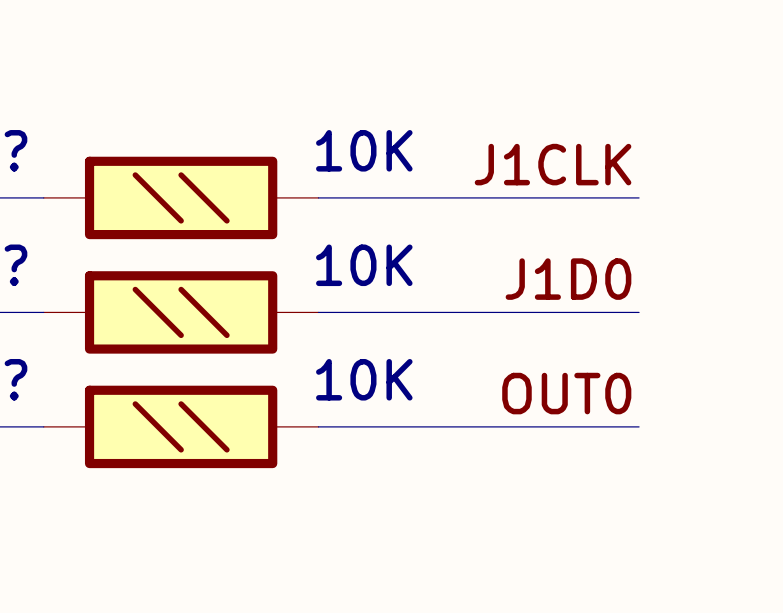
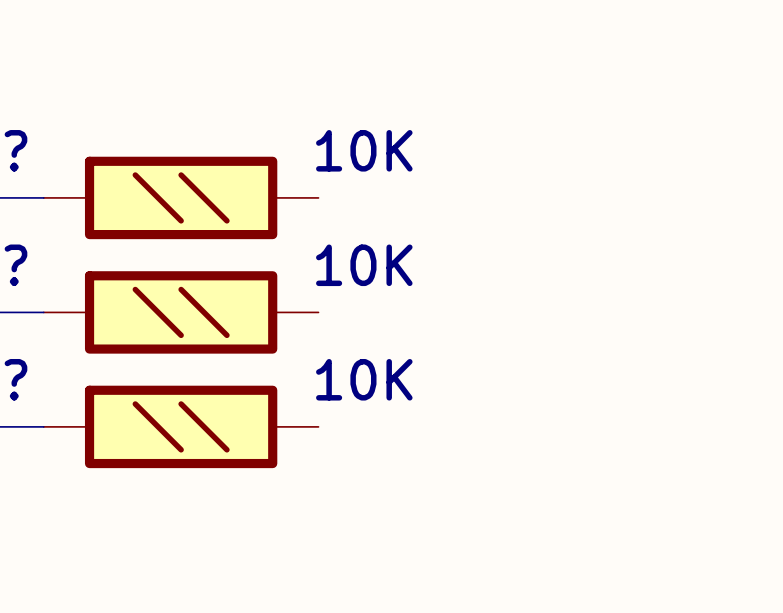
label: J1CLK (553, 164) -> none
wire: (318, 197) (639, 197) -> none
label: J1D0 (568, 279) -> none
wire: (318, 312) (639, 312) -> none
label: OUT0 (566, 393) -> none
wire: (318, 426) (639, 426) -> none

